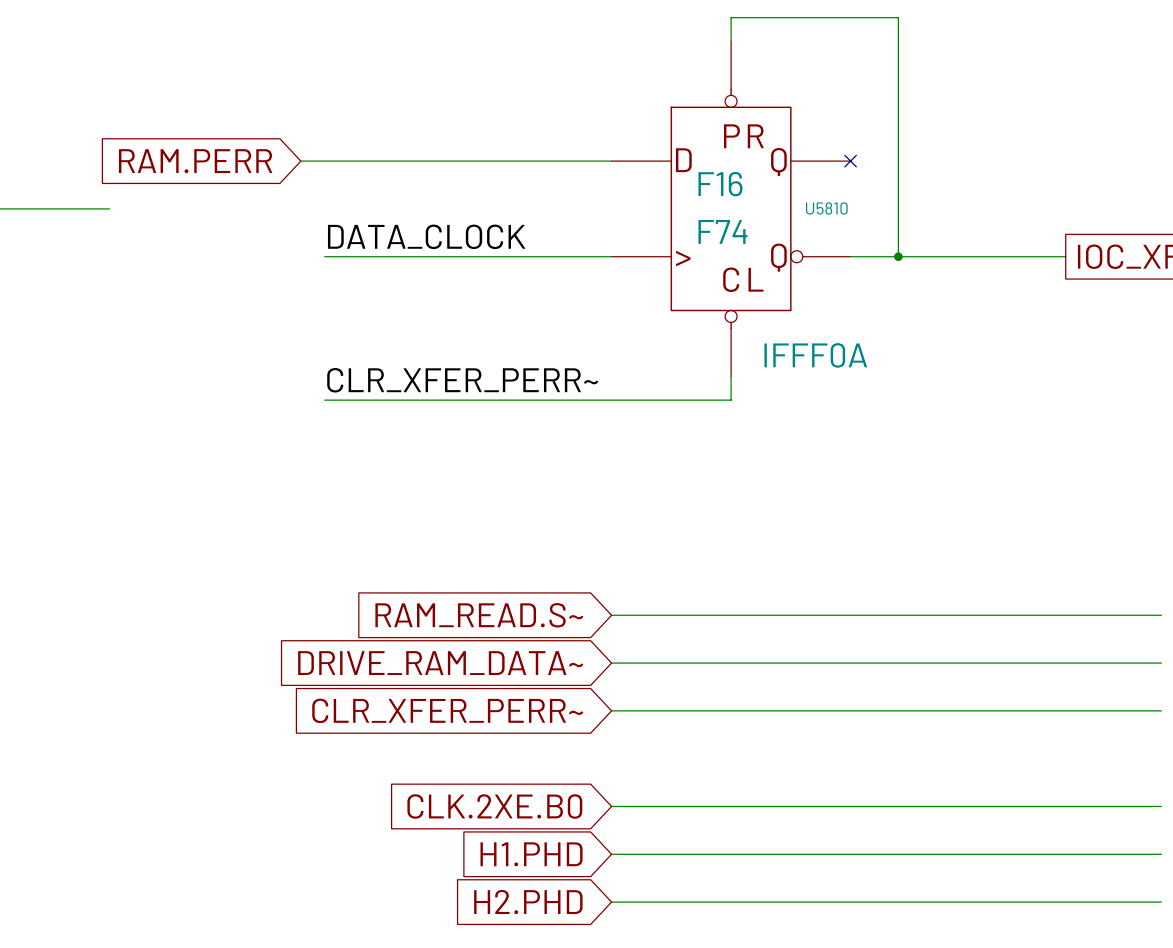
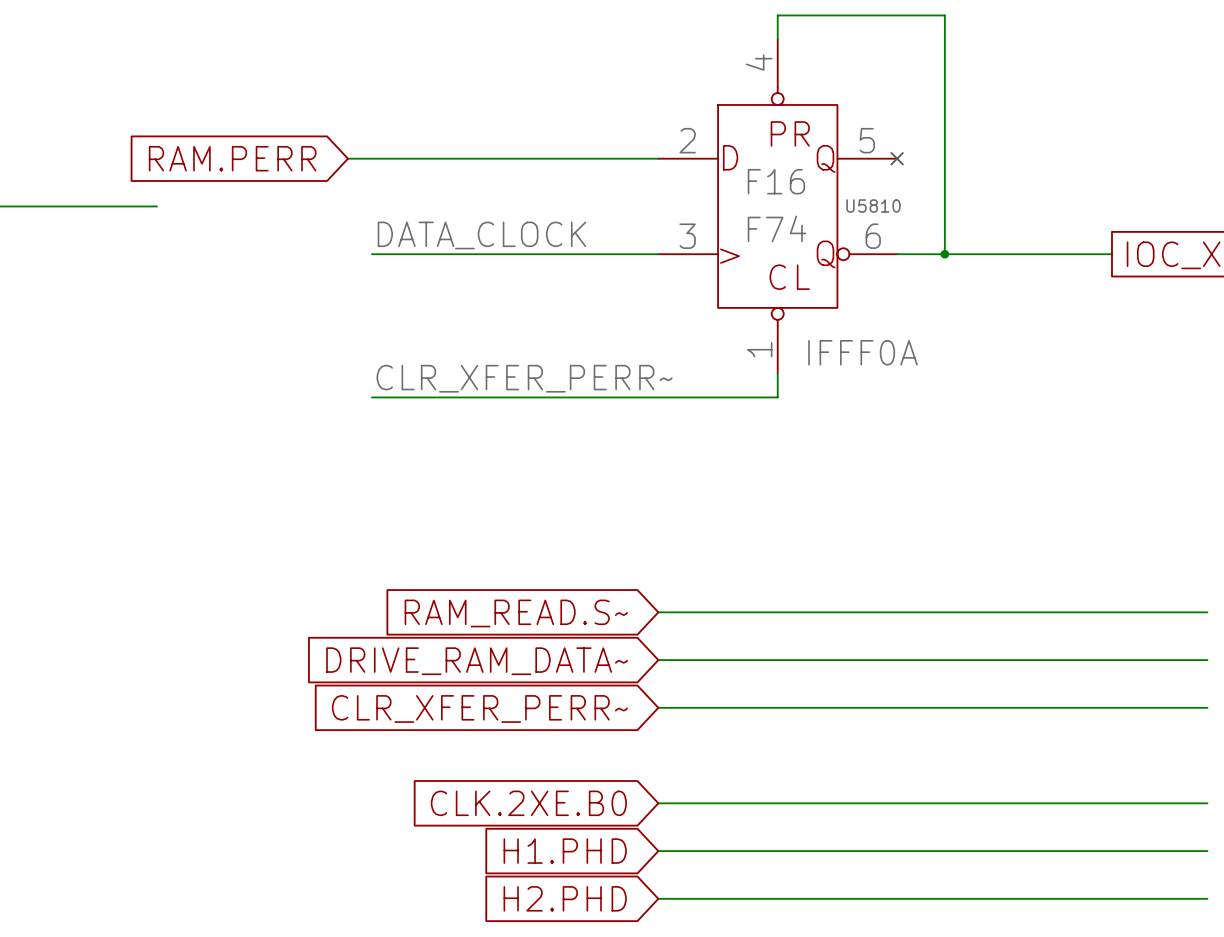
U5810 pin number: none -> 4 (759, 62)
U5810 pin number: none -> 2 (687, 140)
U5810 pin number: none -> 5 (867, 140)
U5810 pin number: none -> 3 (687, 236)
U5810 pin number: none -> 6 (873, 236)
U5810 pin number: none -> 1 (759, 349)

